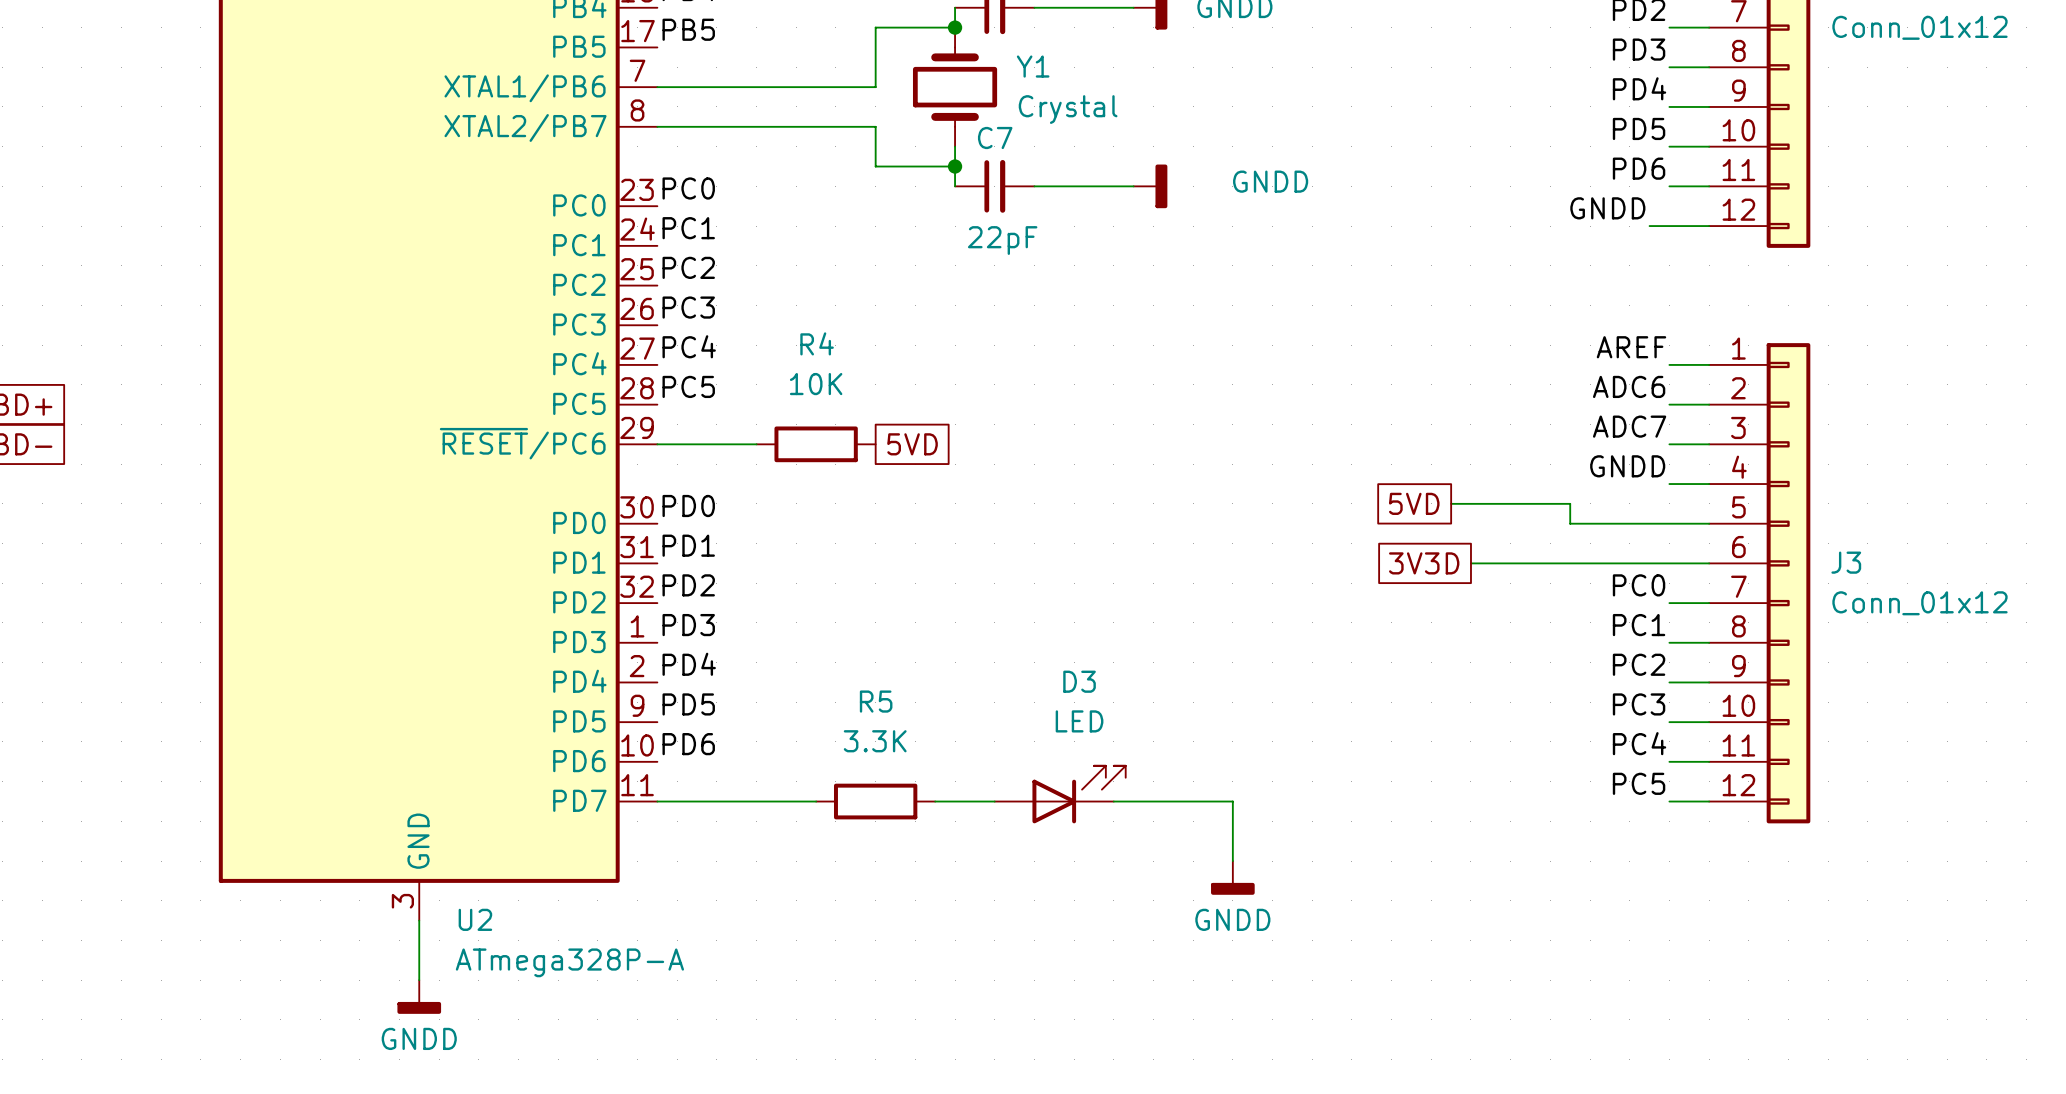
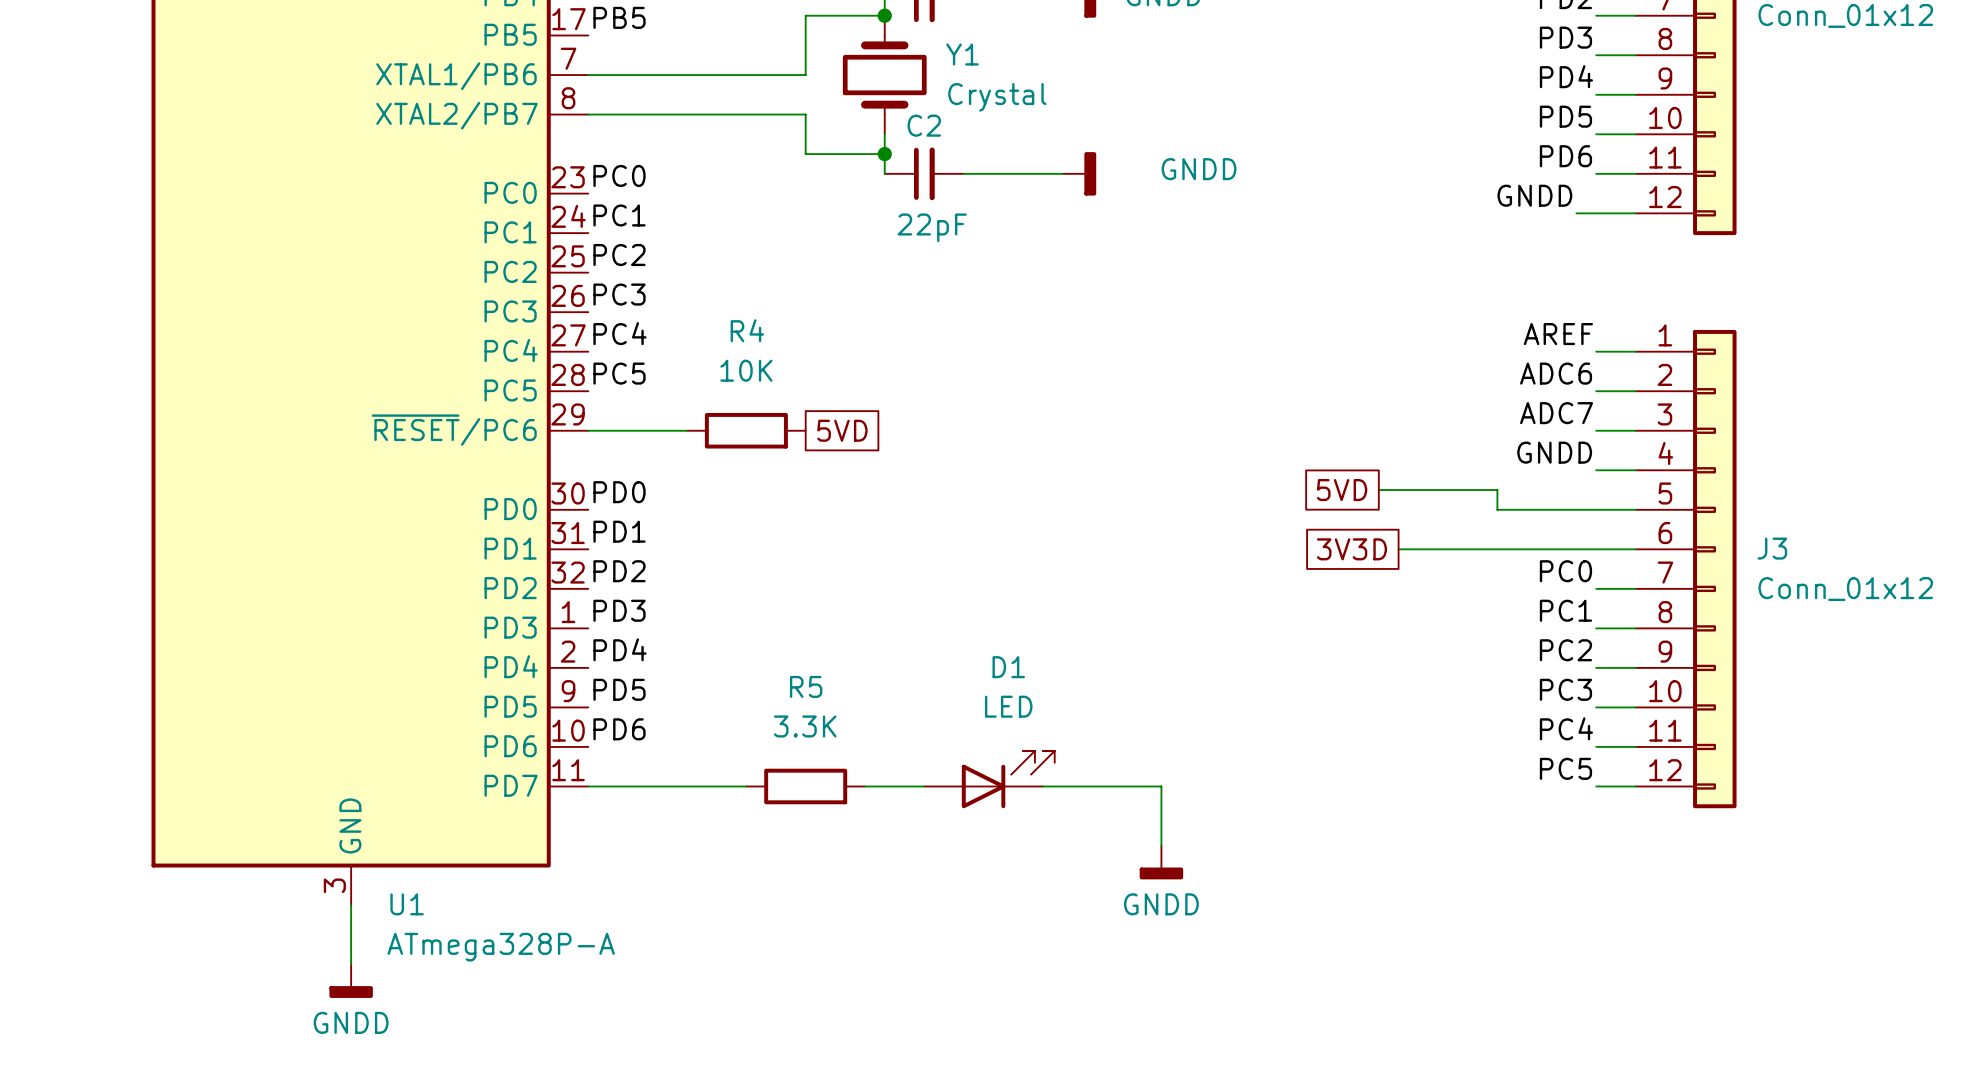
C7 name: C7 (995, 137) -> C2 (924, 125)
D3 name: D3 (1079, 681) -> D1 (1008, 667)
U2 name: U2 (475, 919) -> U1 (407, 904)

